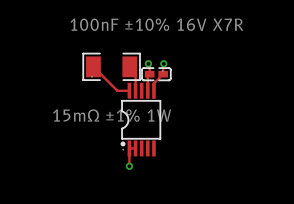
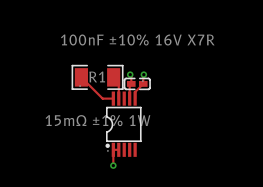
R1 name: none -> R1 (97, 76)

